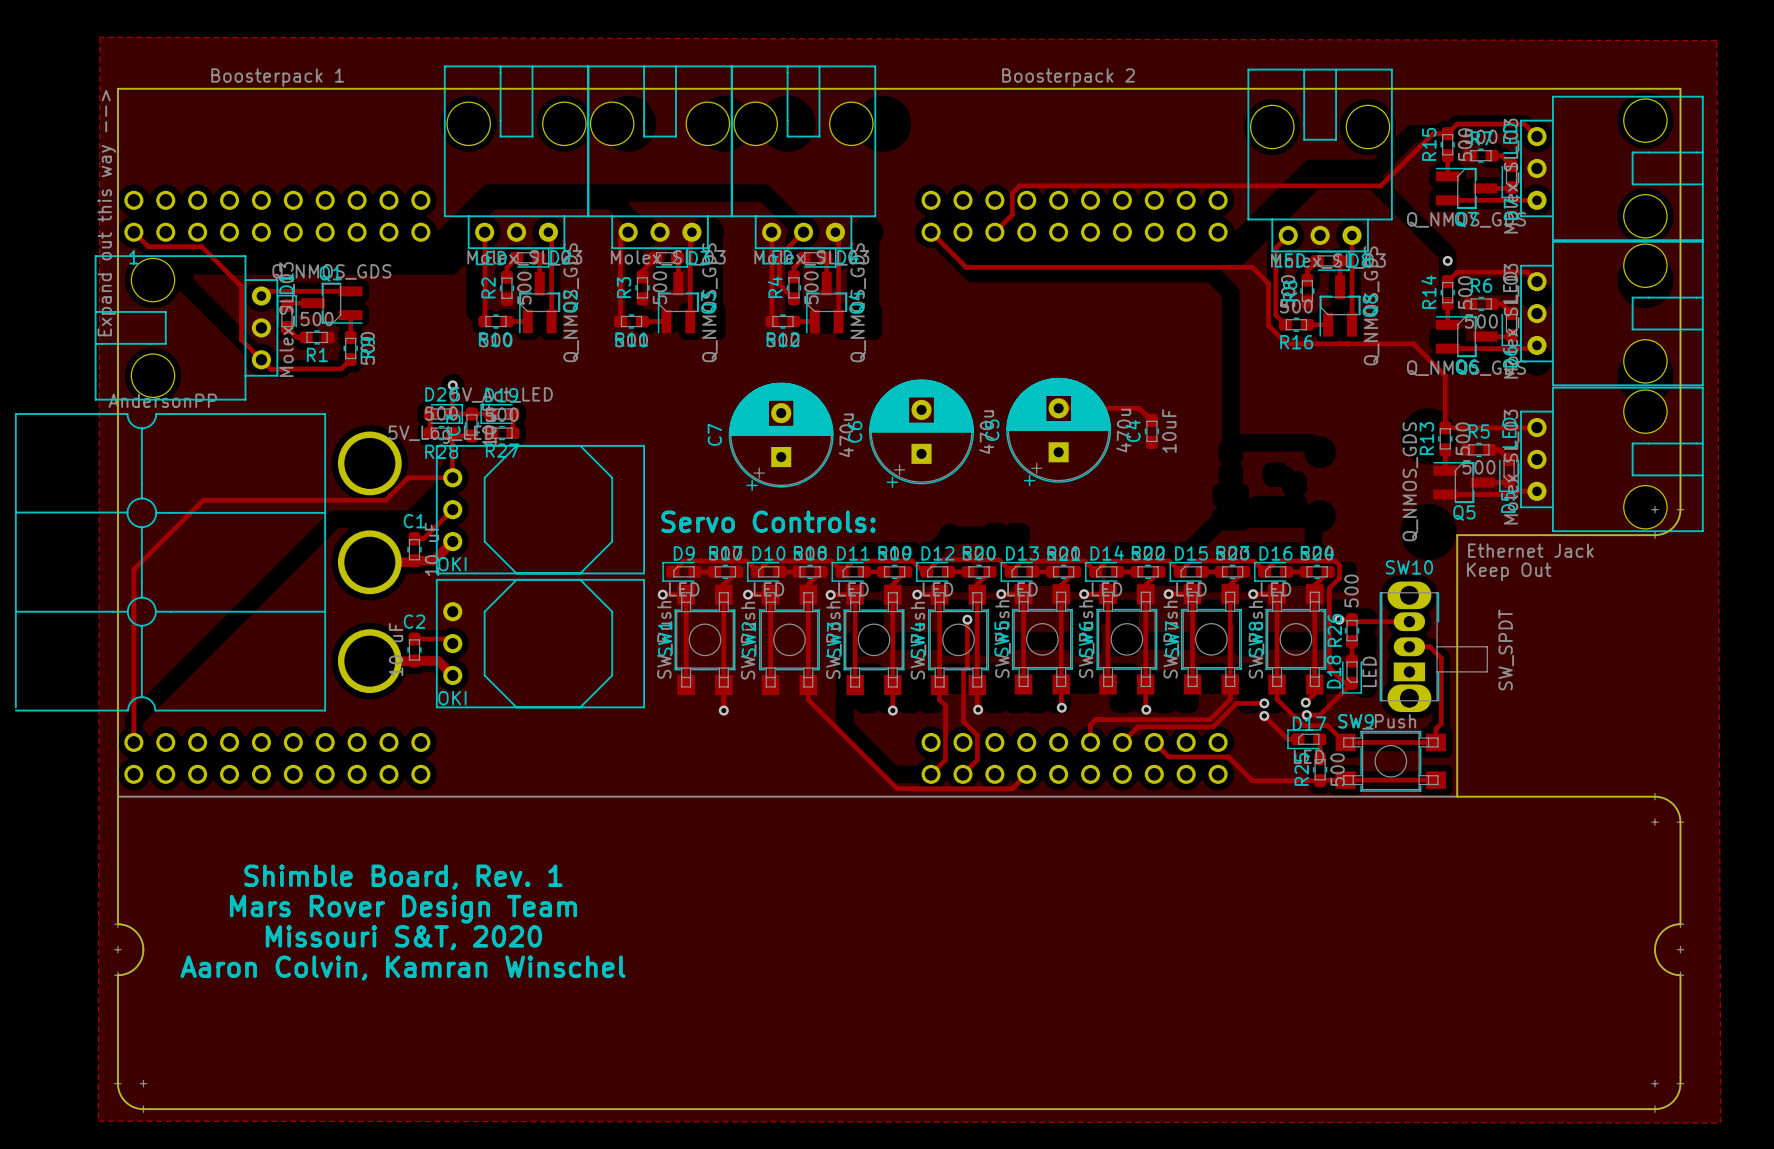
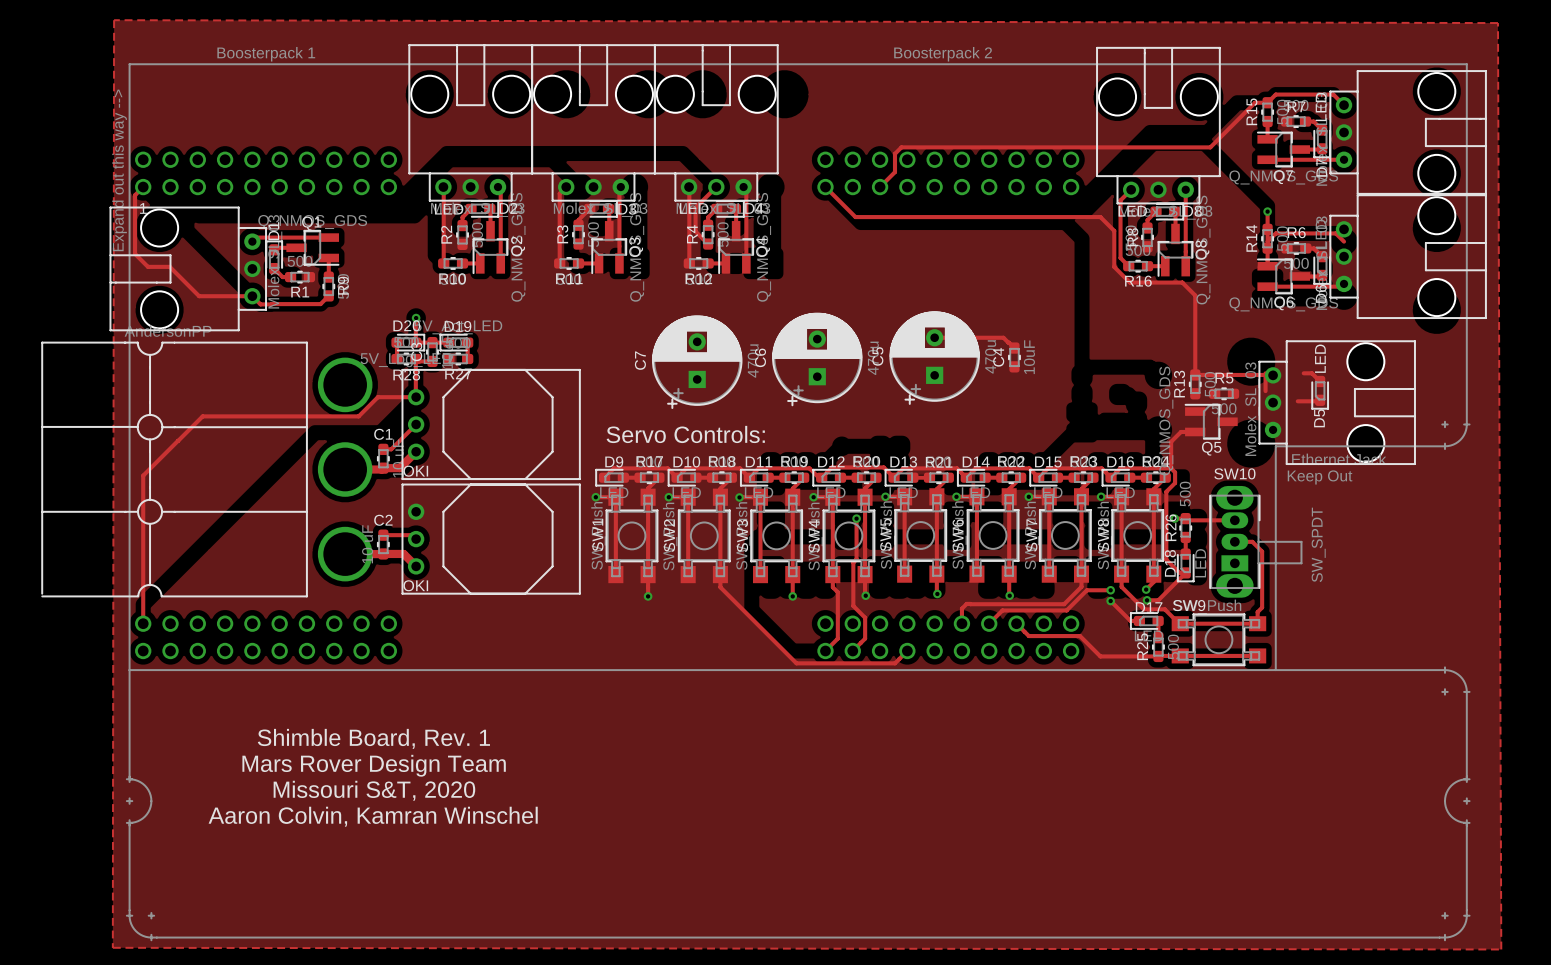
board edge: (117, 88) (117, 924) (127, 926) (135, 931) (141, 939) (143, 949) (141, 959) (135, 967) (127, 973) (117, 975) (118, 1086) (121, 1096) (130, 1105) (143, 1109) (1654, 1109) (1667, 1105) (1677, 1096) (1680, 1083) (1680, 975) (1670, 973) (1662, 967) (1656, 959) (1654, 949) (1656, 939) (1662, 931) (1670, 926) (1680, 924) (1680, 822) (1678, 812) (1670, 801) (1658, 796) (1457, 796) (1457, 535) (1654, 535) (1667, 531) (1677, 522) (1680, 509) (1680, 88) (117, 88) -> none
track: (133, 232) (148, 246) (201, 246) (241, 286) (241, 339) (261, 359) -> (143, 187) (135, 195) (135, 253) (147, 266) (169, 266) (199, 296) (252, 296)
track: none -> (1267, 211) (1267, 241) (1275, 233) (1335, 233) (1344, 241)
track: (1447, 281) (1457, 272) (1527, 272) (1536, 281) -> none
track: (1348, 343) (1413, 343) (1445, 375) (1445, 427) (1536, 427) -> (1182, 282) (1195, 295) (1195, 374) (1272, 375)
R13 position: (1445, 438) -> (1195, 384)
R5 position: (1478, 449) -> (1224, 393)
part position: (1611, 459) -> (1337, 402)
Q5 position: (1464, 482) -> (1211, 421)
track: (1536, 491) (1516, 491) (1513, 494) (1445, 494) -> none
track: none -> (1195, 431) (1180, 431) (1171, 441) (1171, 468)

